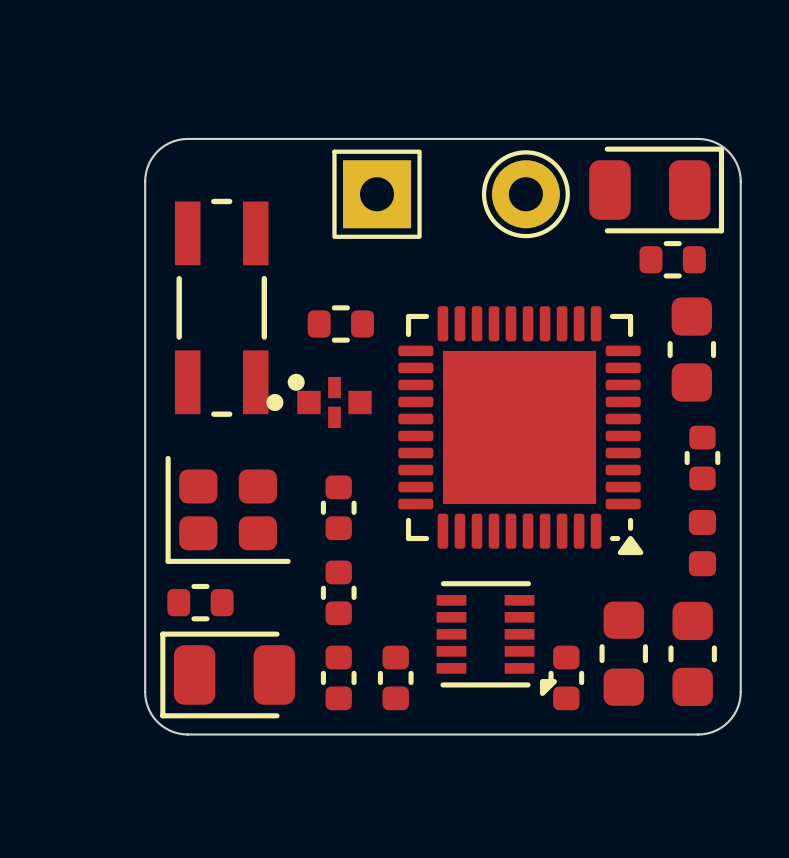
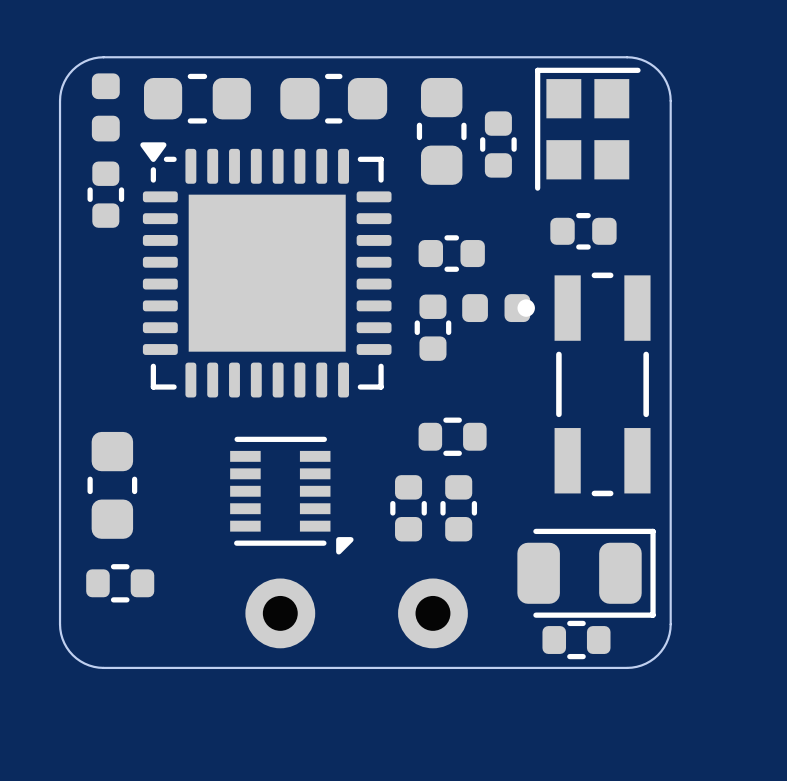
part footprint: [589, 146, 725, 234] -> [535, 67, 641, 191]
part: none -> (333, 98)
part: none -> (105, 107)
part: (451, 194) -> none
part: none -> (441, 131)
part: none -> (498, 144)
part: (672, 259) -> none
part: none -> (105, 194)
part footprint: [307, 305, 375, 343] -> [140, 142, 392, 398]
part footprint: [398, 306, 644, 556] -> [414, 294, 452, 361]
part rotation: 0° (239, 307) -> 180° (584, 384)
part position: (239, 307) -> (584, 384)
part: none -> (583, 231)
part: none -> (451, 253)
part: (691, 349) -> none
part: (319, 402) -> none
part: (702, 458) -> none
part: (338, 507) -> none
part: (228, 509) -> none
part: none -> (452, 436)
part rotation: 0° (702, 543) -> 90° clockwise (496, 308)
part position: (702, 543) -> (496, 308)
part: none -> (112, 485)
part: none -> (408, 508)
part: none -> (458, 508)
part: (338, 592) -> none
part position: (200, 602) -> (120, 583)
part position: (496, 638) -> (291, 495)
part rotation: 0° (623, 653) -> 90° clockwise (197, 98)
part position: (623, 653) -> (197, 98)
part: (692, 653) -> none
part rotation: 0° (227, 674) -> 180° (586, 573)
part position: (227, 674) -> (586, 573)
part: (338, 677) -> none
part: (395, 677) -> none
part: (566, 677) -> none
part: none -> (356, 613)
part: none -> (576, 640)

